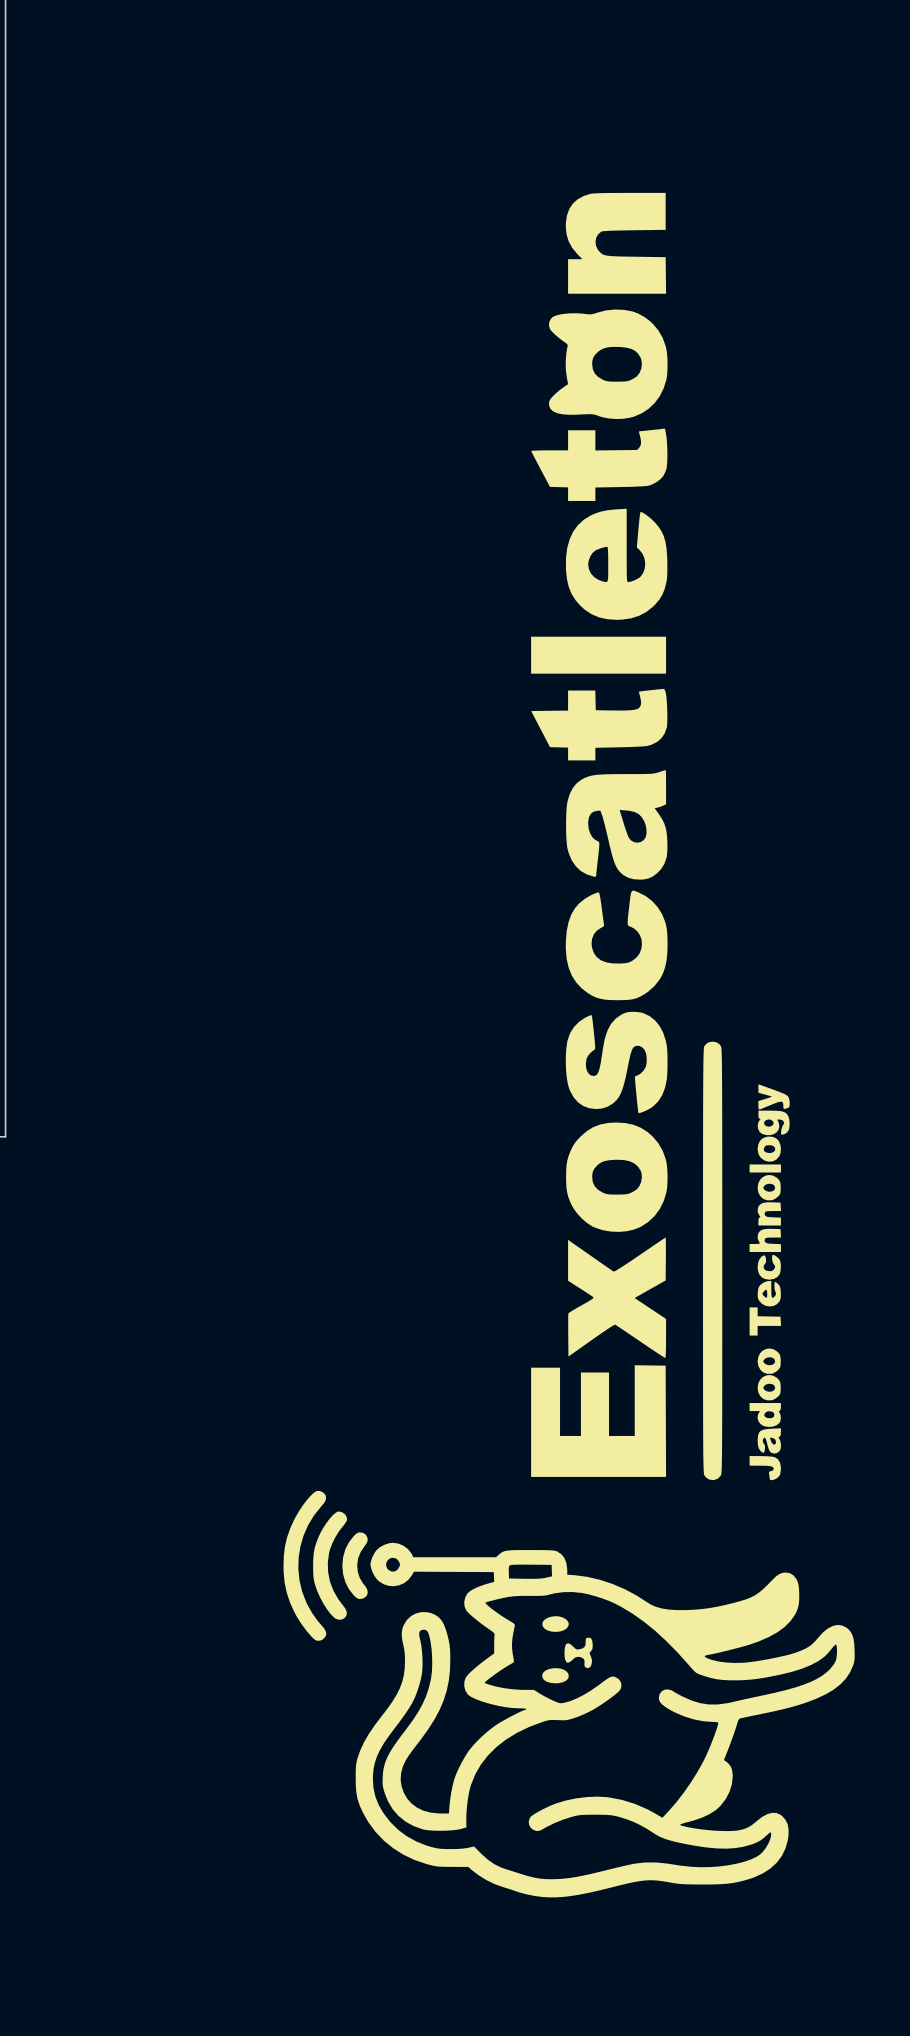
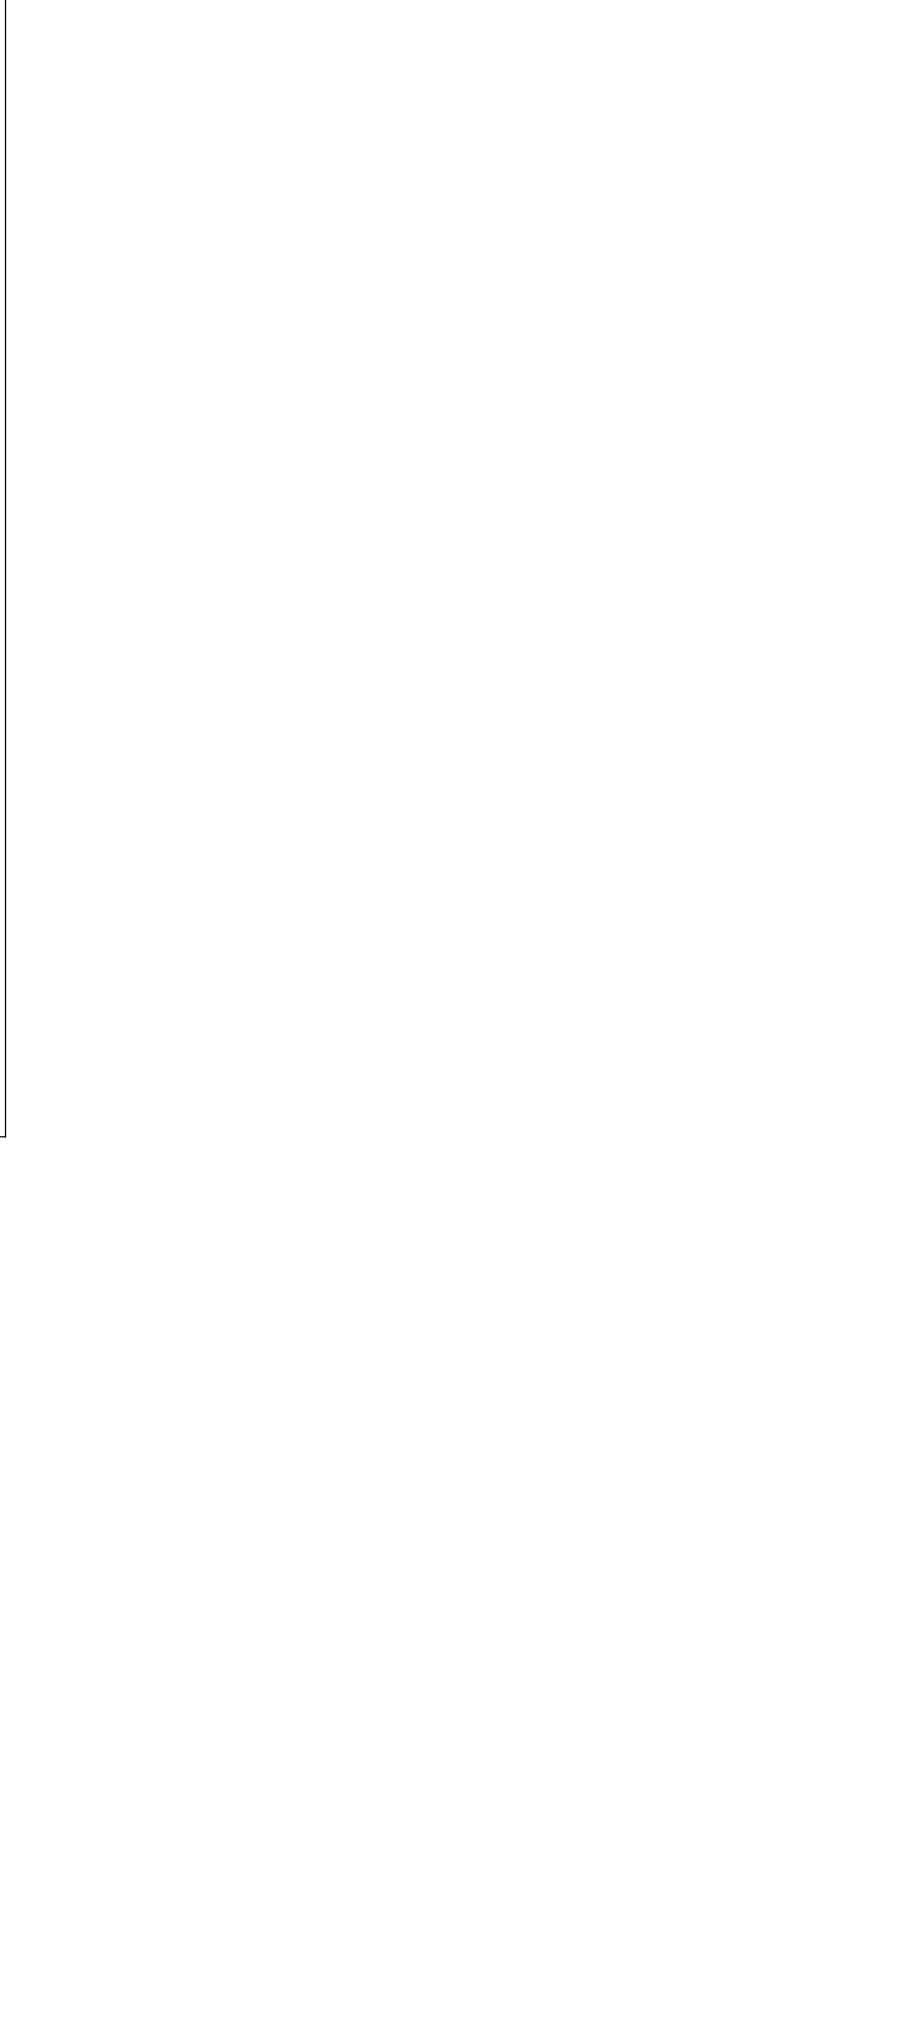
drawing: [283, 192, 855, 1898] -> none

